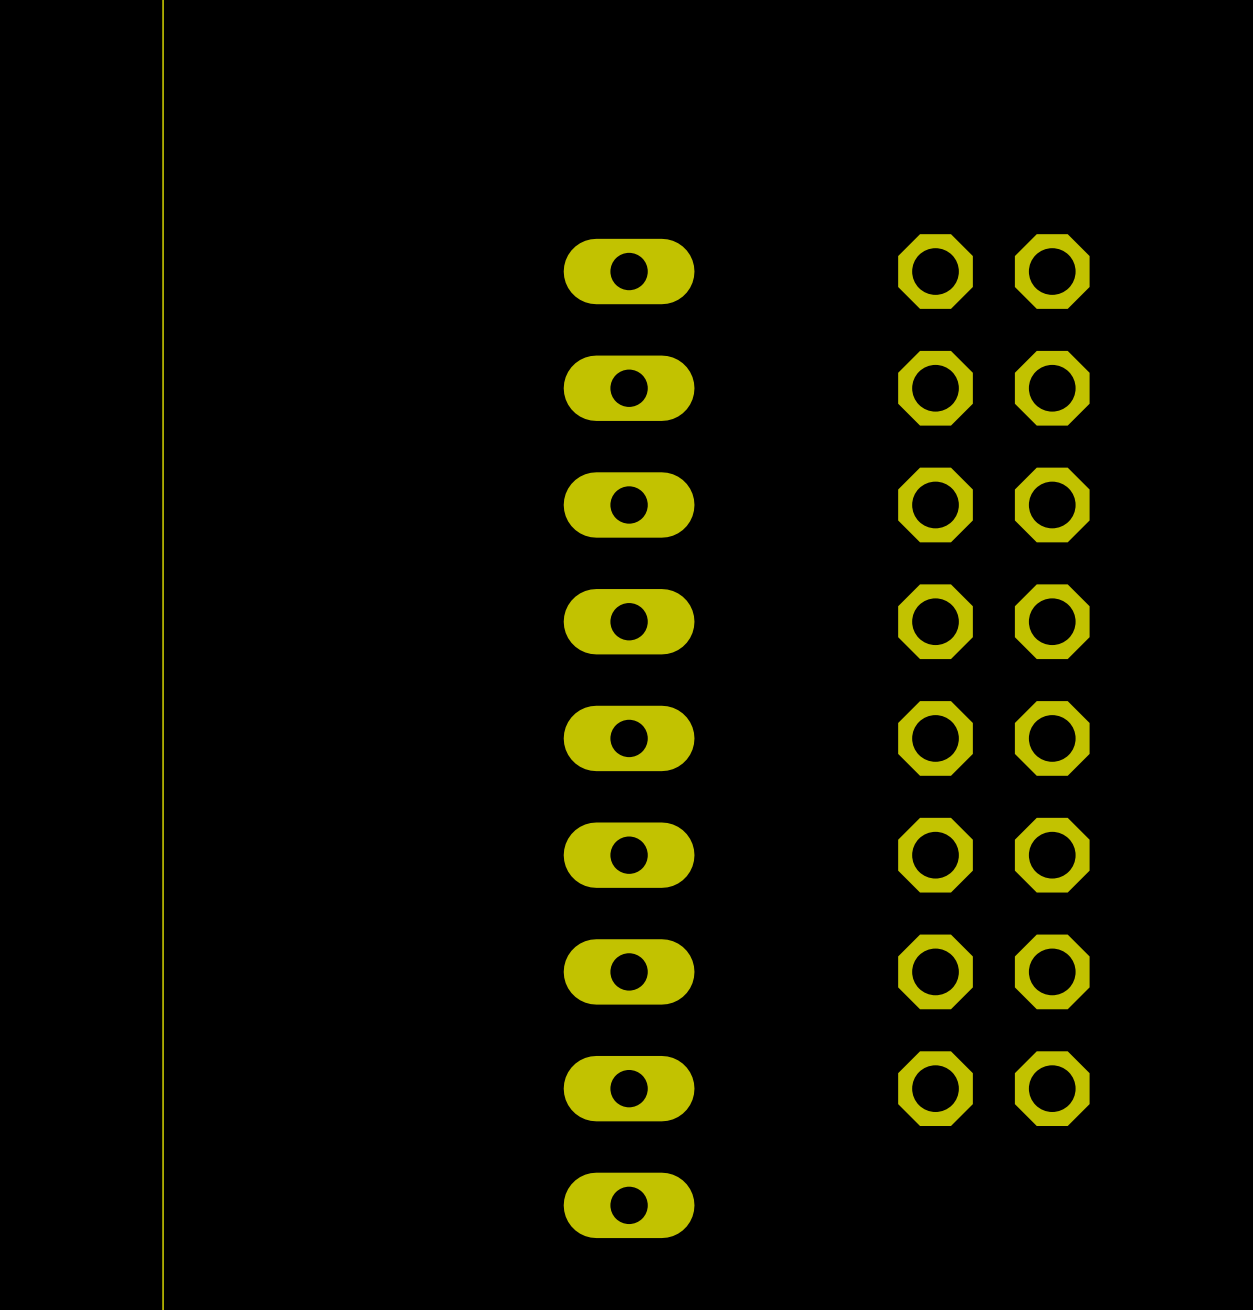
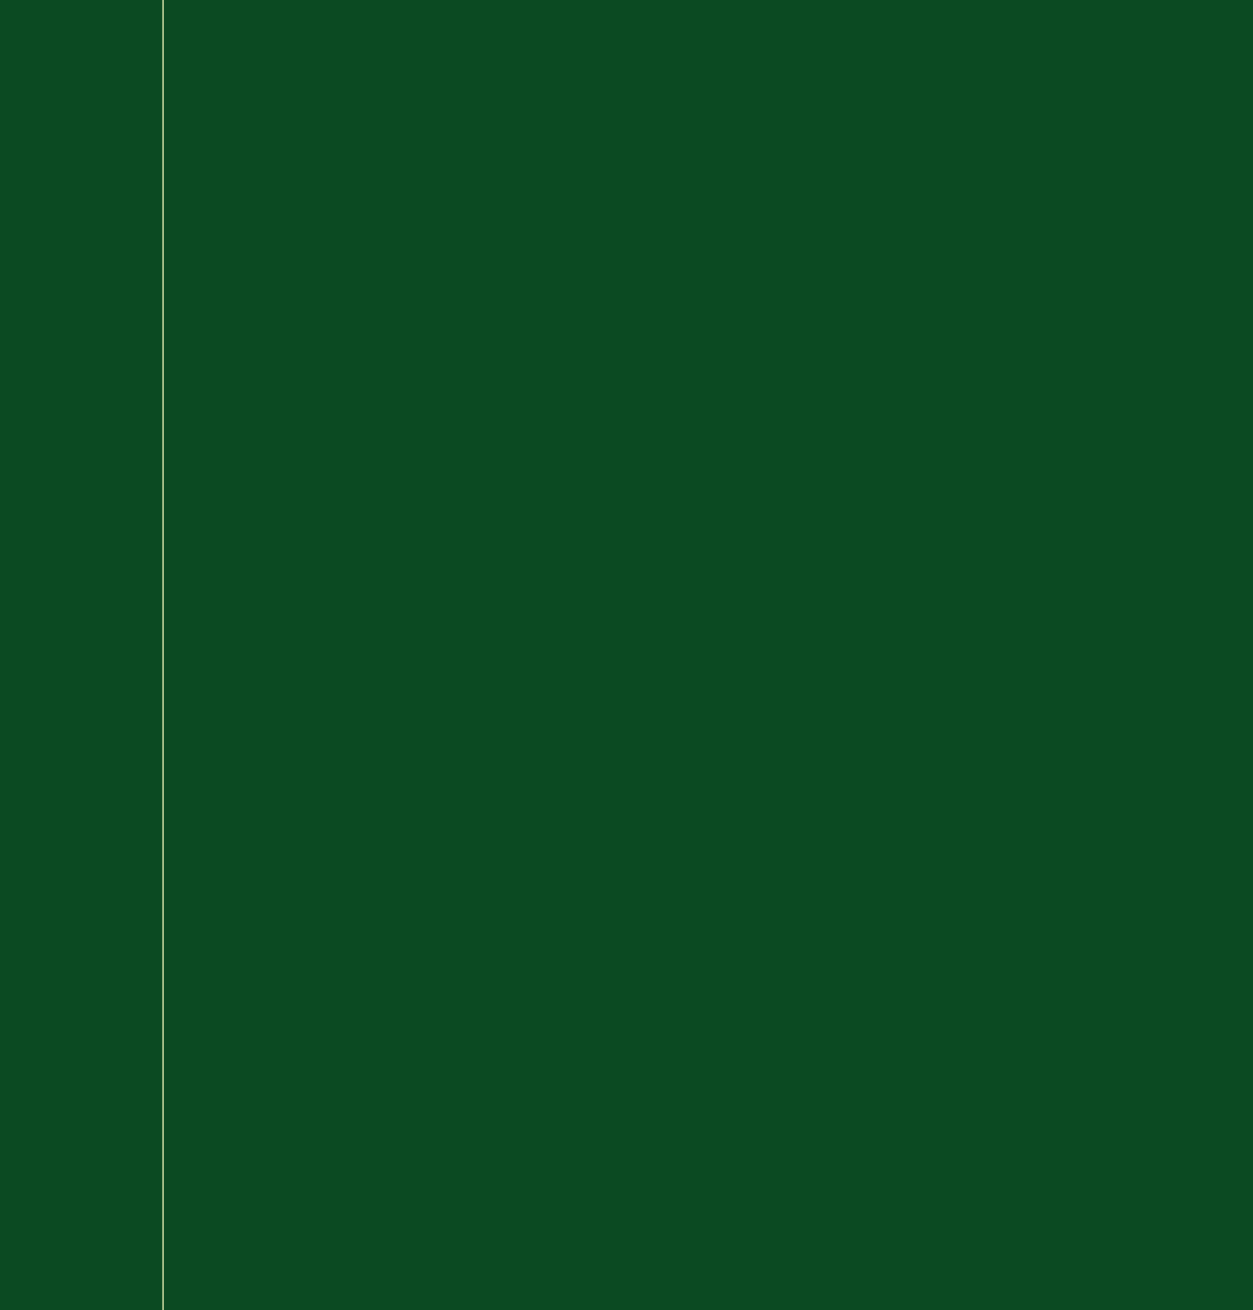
part: (993, 680) -> none
part: (629, 738) -> none

